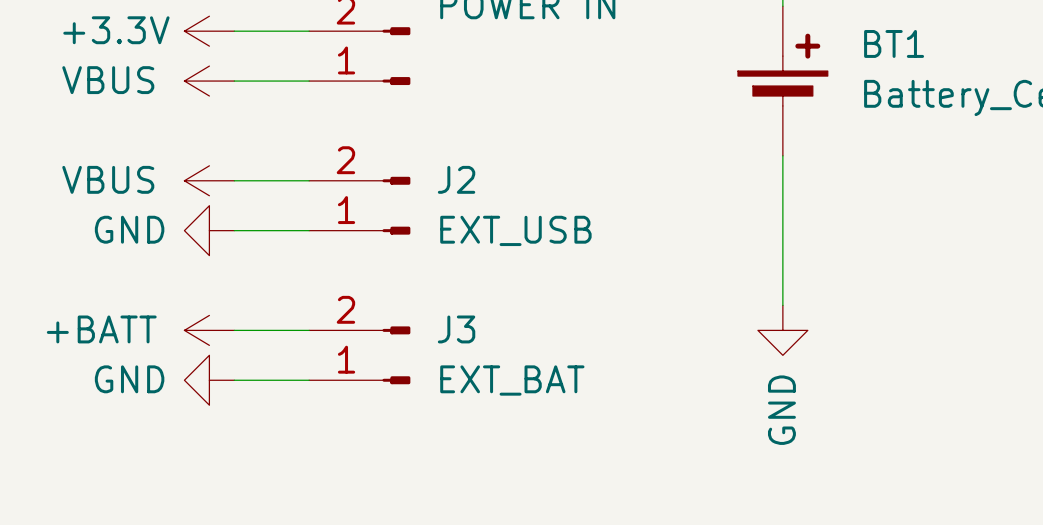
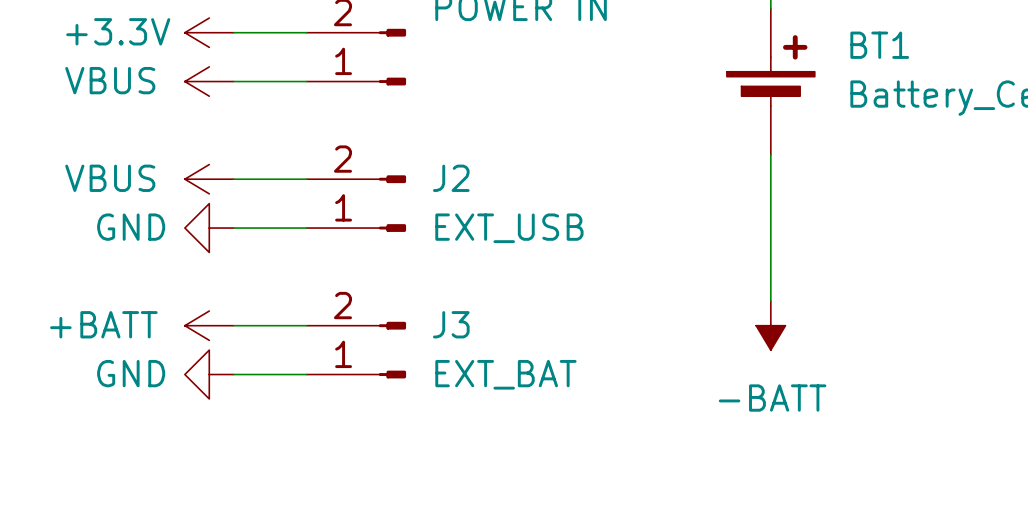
power symbol: GND (782, 330) -> -BATT (770, 325)

